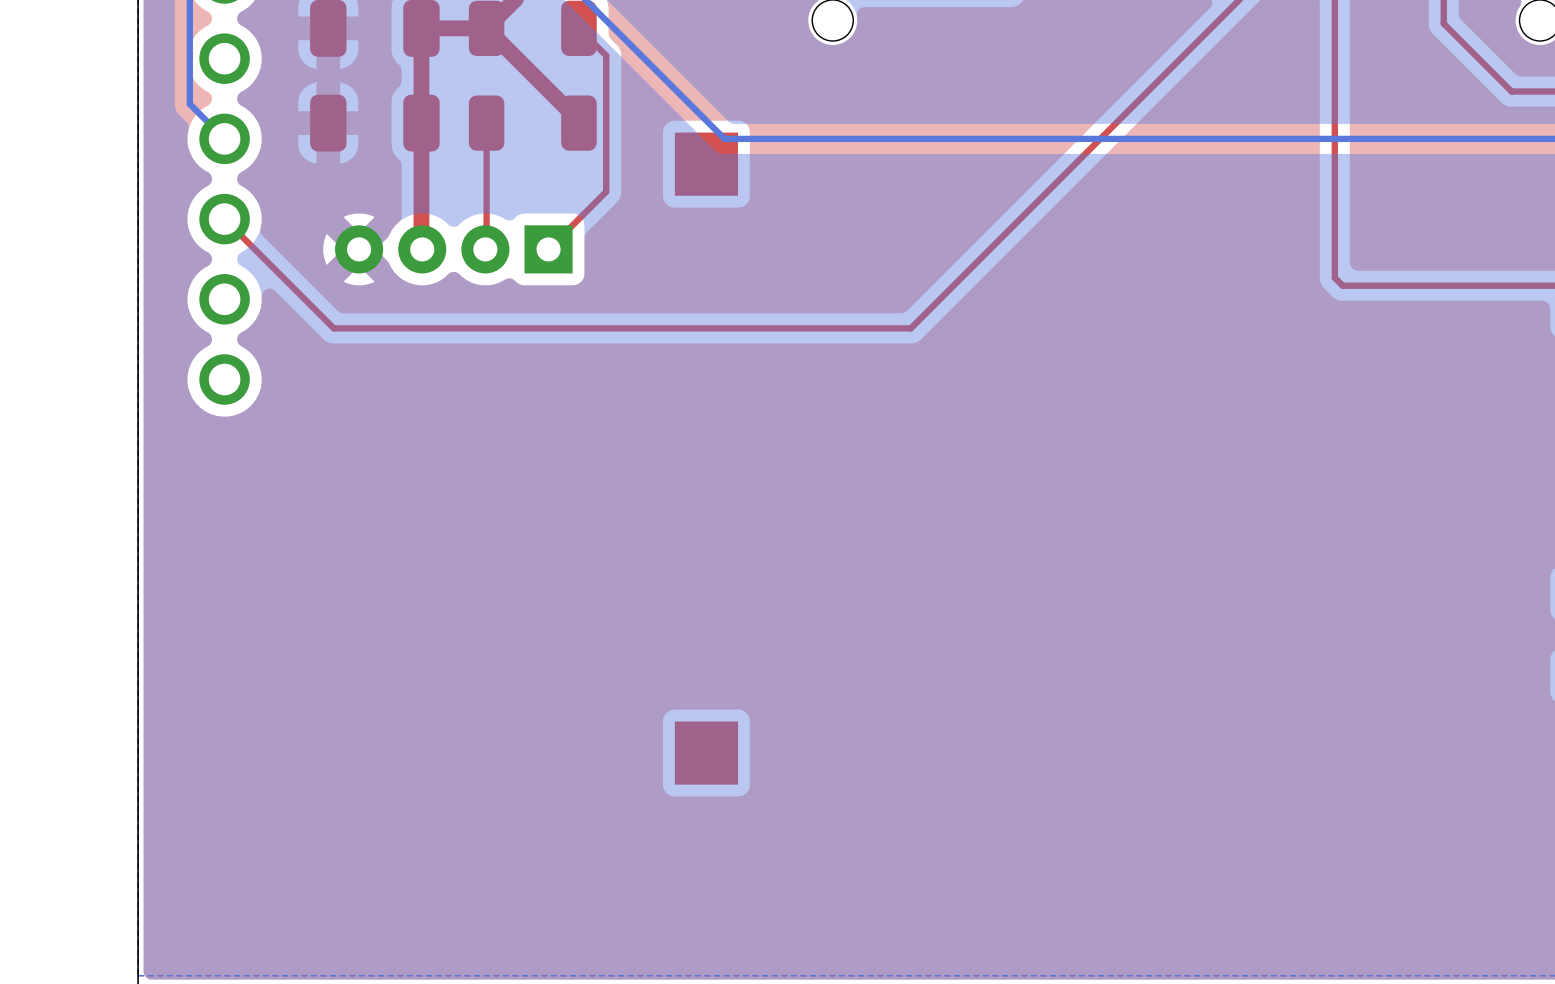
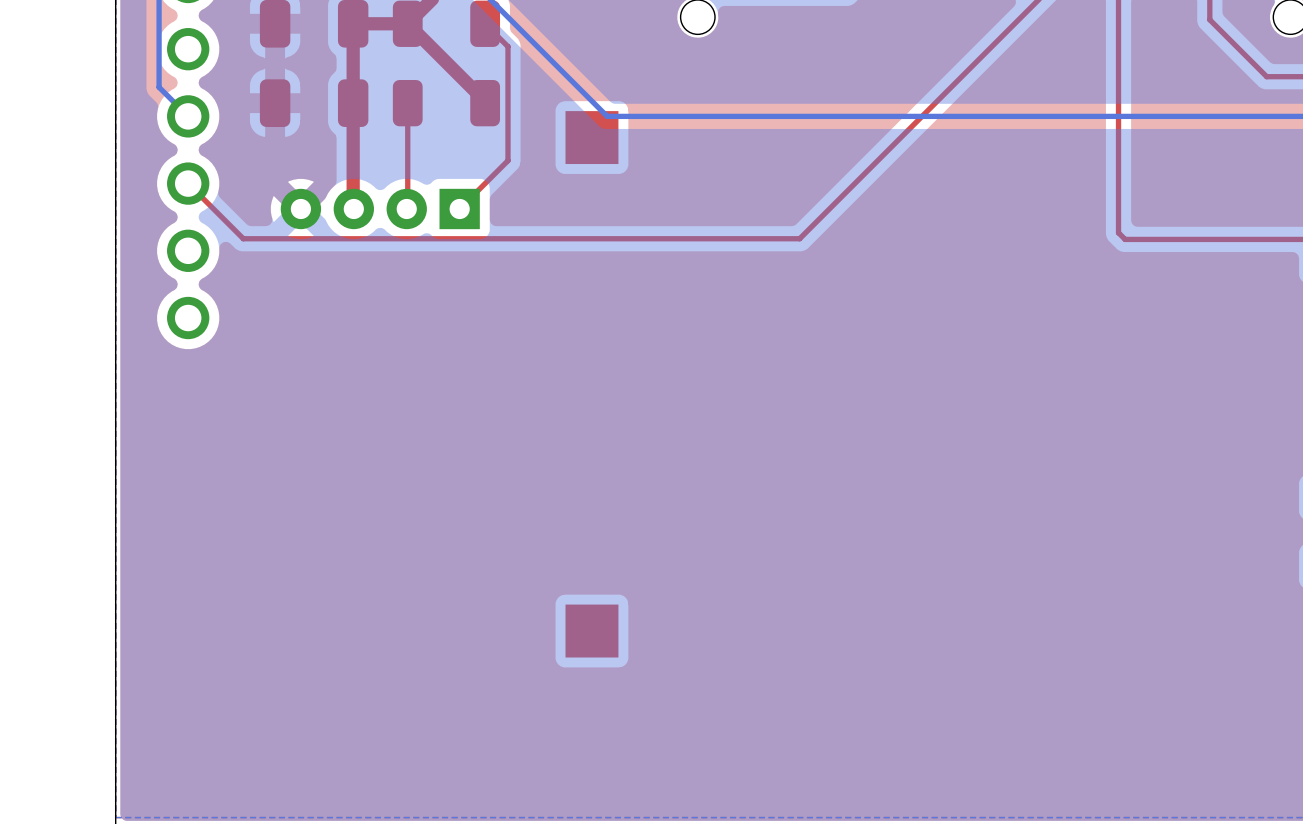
top track: (954, 284) (910, 328) (333, 328) (290, 284) -> (799, 238) (243, 238)

